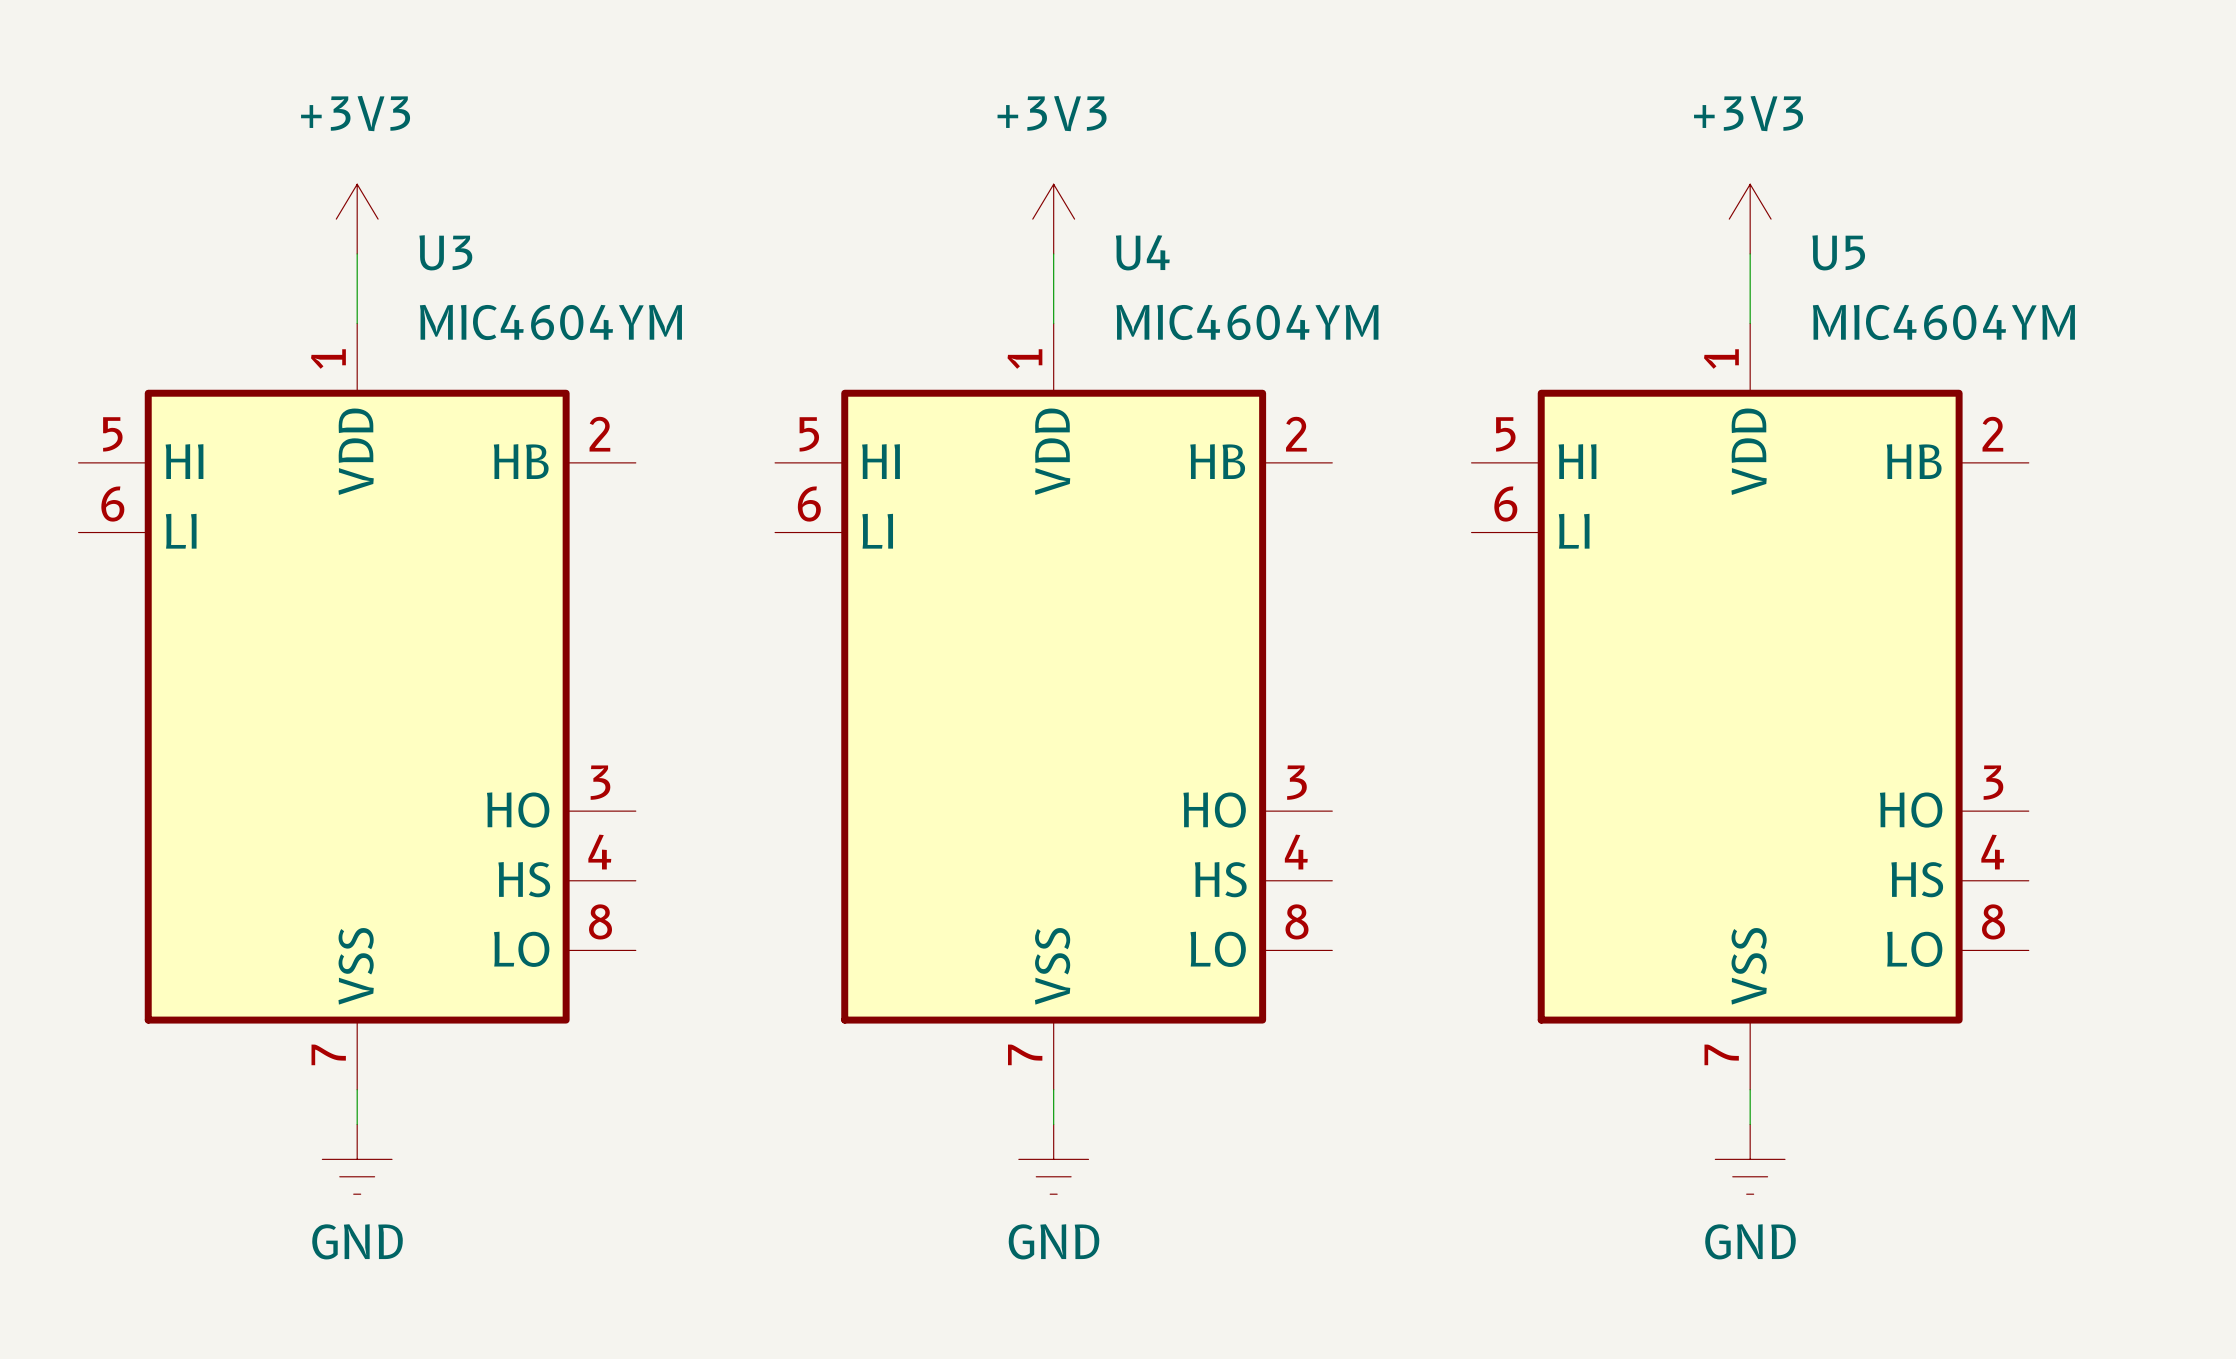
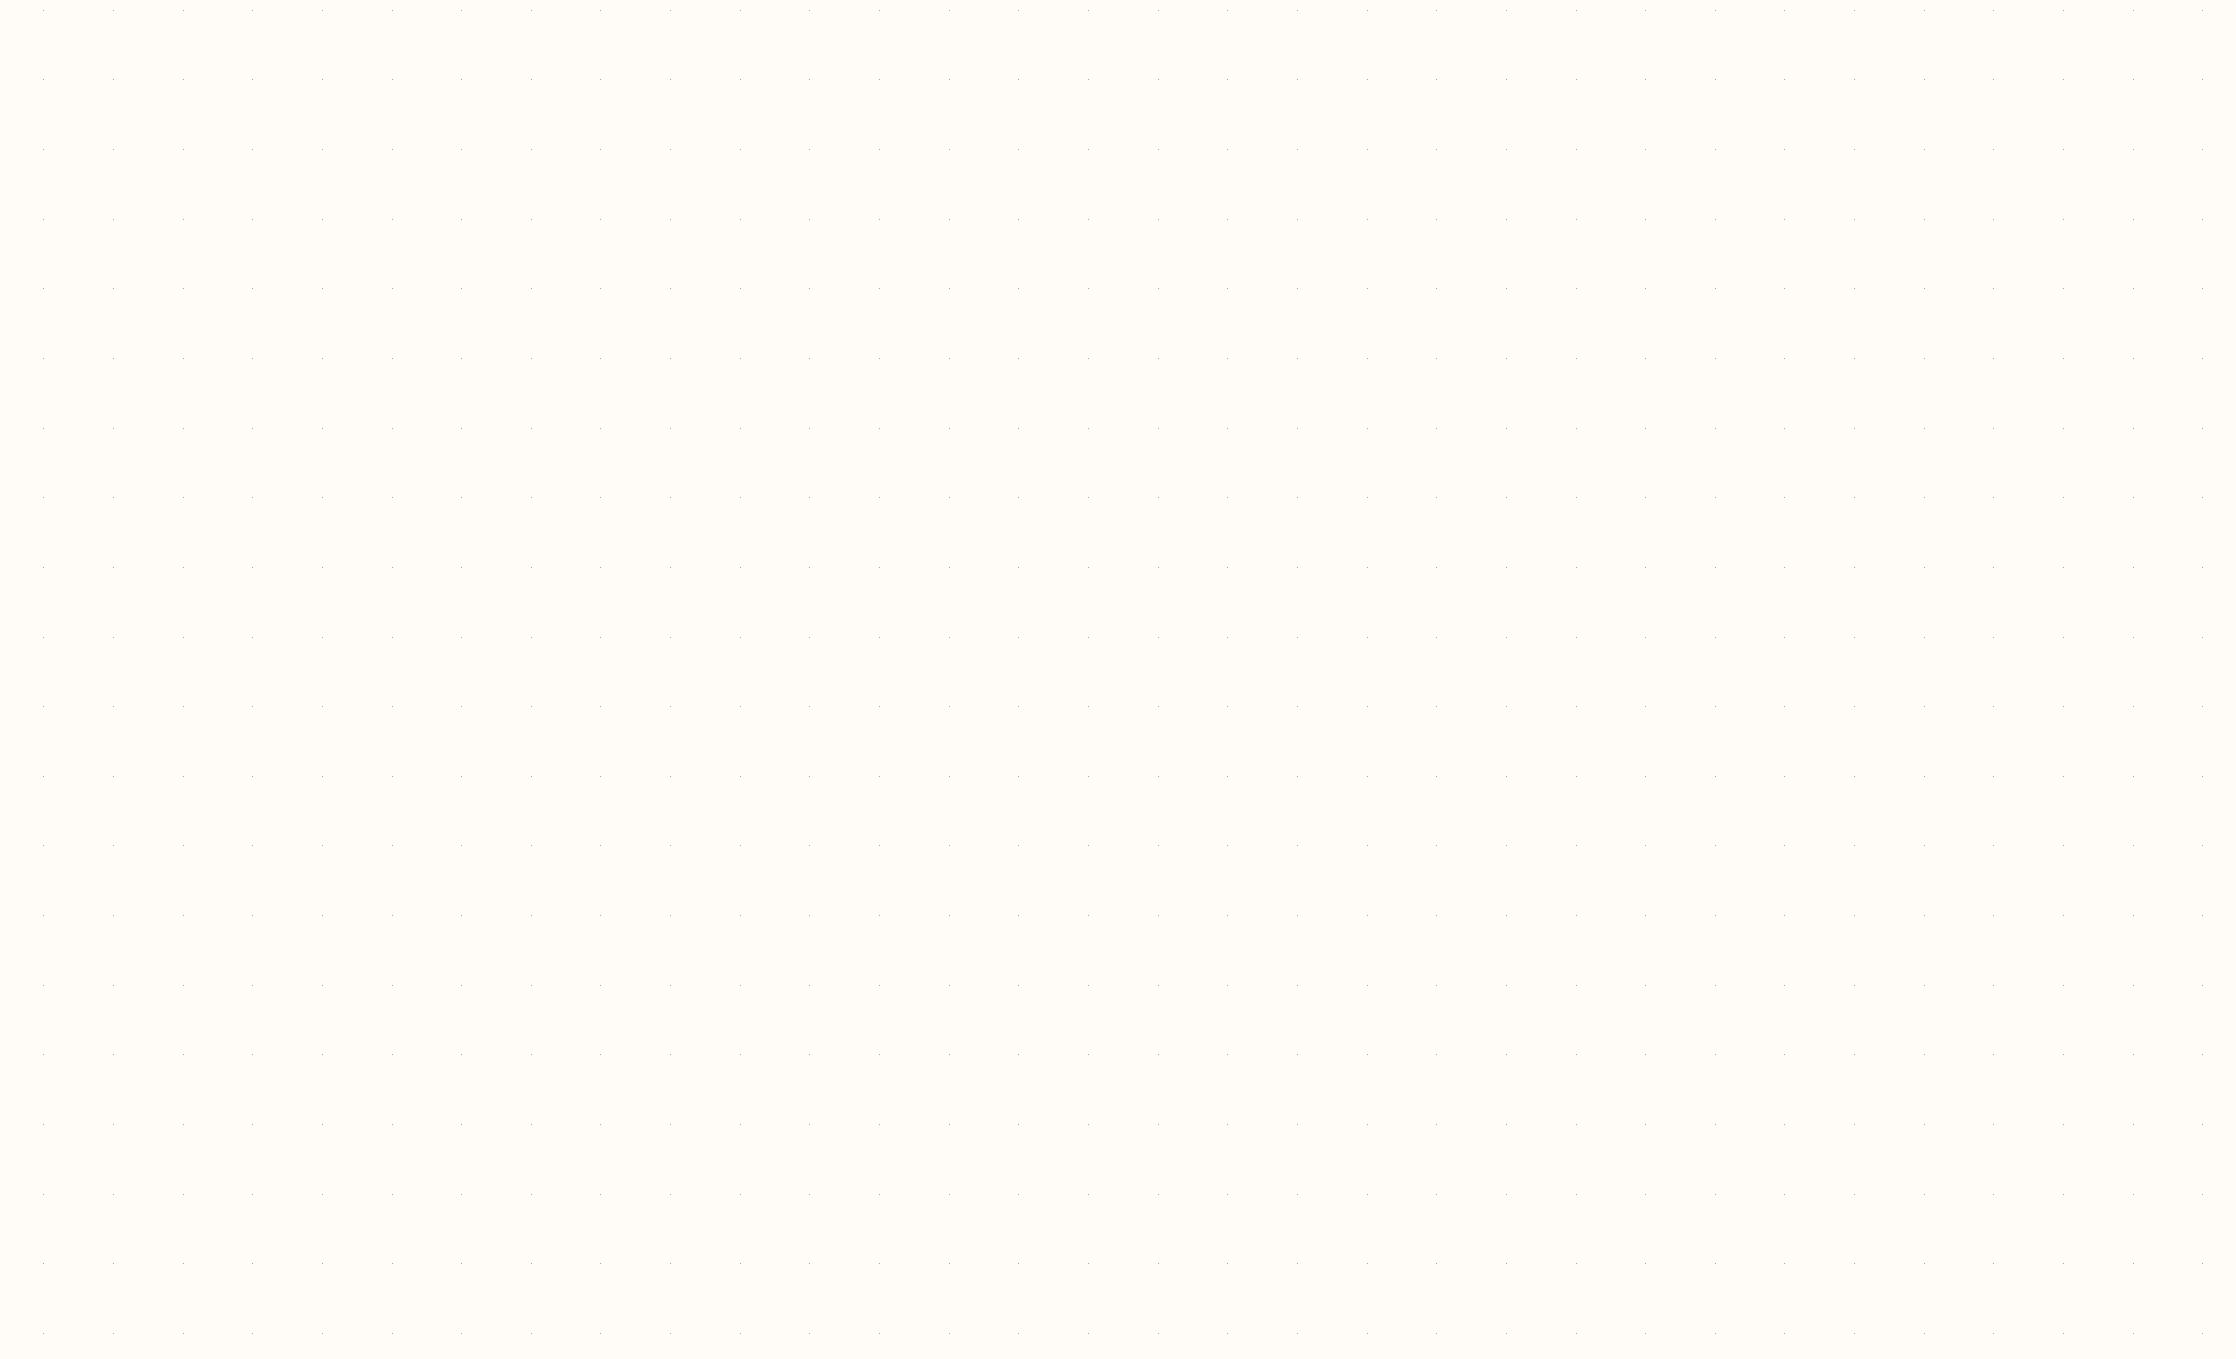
power symbol: +3V3 (357, 219) -> none
power symbol: +3V3 (1053, 219) -> none
power symbol: +3V3 (1750, 219) -> none
wire: (357, 253) (357, 323) -> none
wire: (1053, 253) (1053, 323) -> none
wire: (1750, 253) (1750, 323) -> none
U3: MIC4604YM (357, 706) -> none
U4: MIC4604YM (1053, 706) -> none
U5: MIC4604YM (1750, 706) -> none
wire: (357, 1089) (357, 1124) -> none
wire: (1053, 1089) (1053, 1124) -> none
wire: (1750, 1089) (1750, 1124) -> none
power symbol: GND (357, 1159) -> none
power symbol: GND (1053, 1159) -> none
power symbol: GND (1750, 1159) -> none

